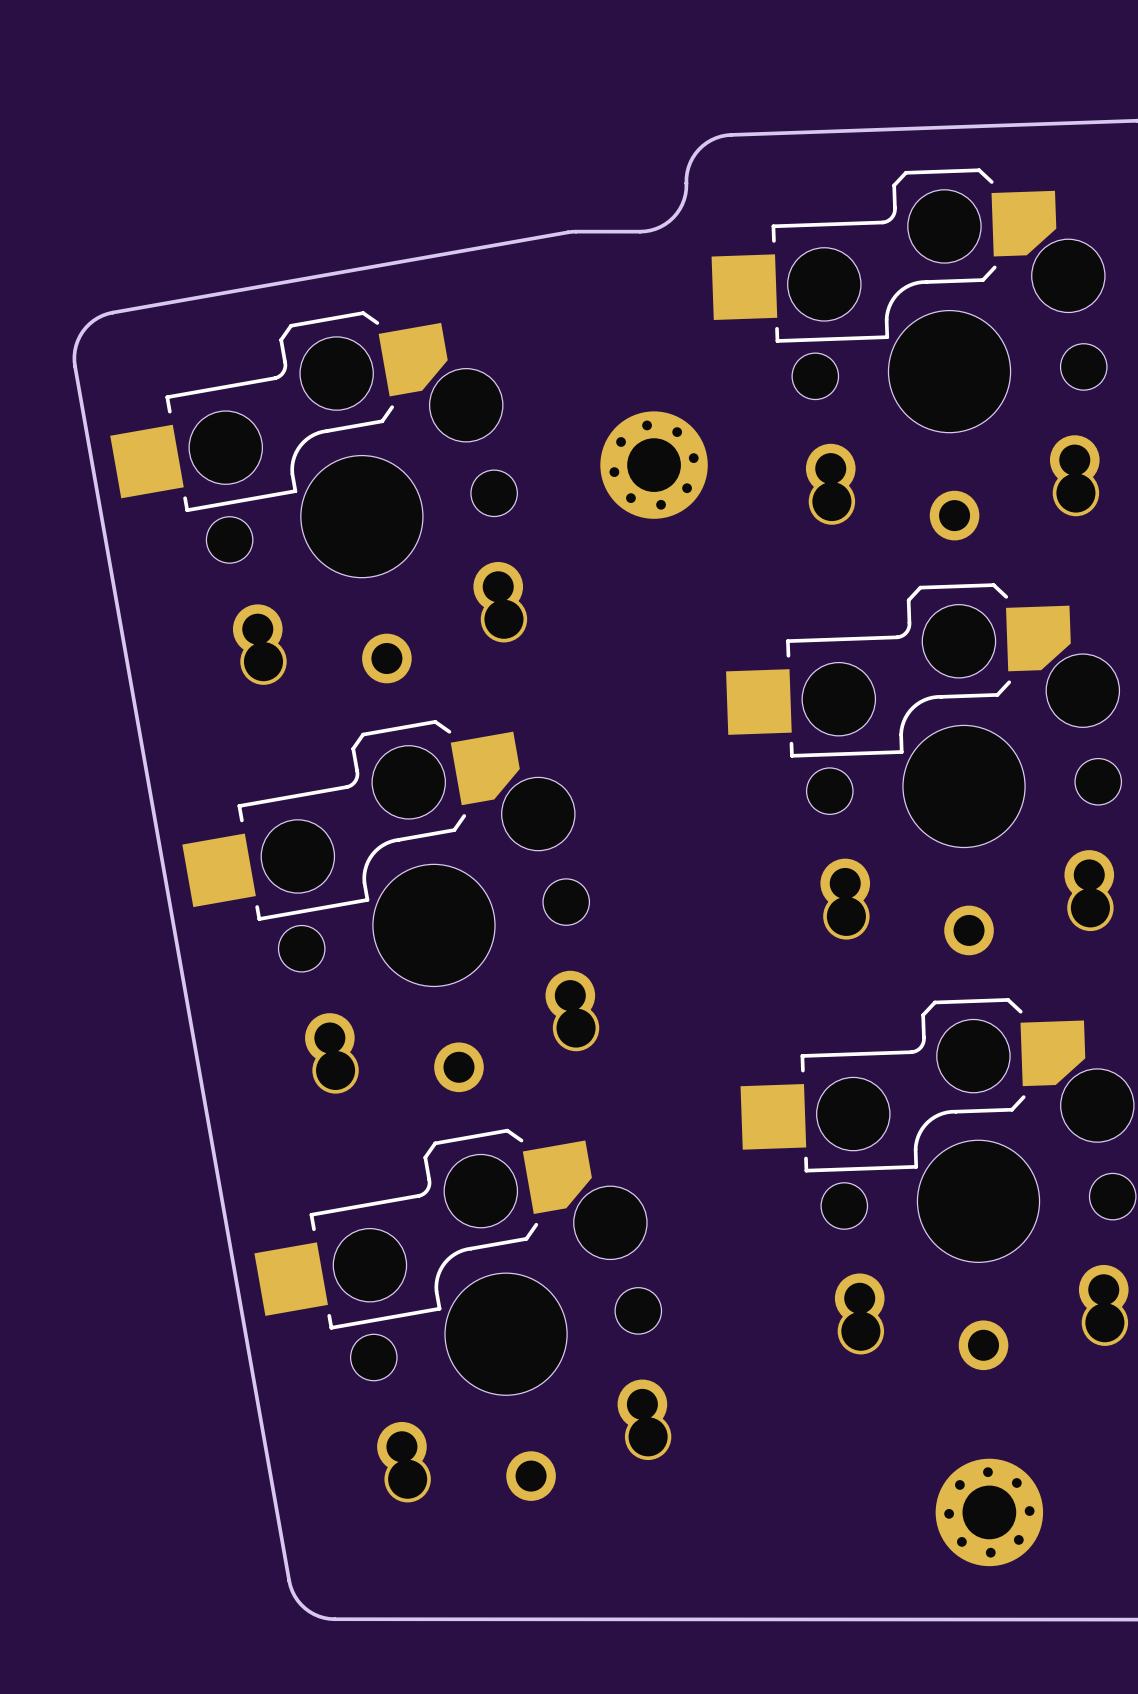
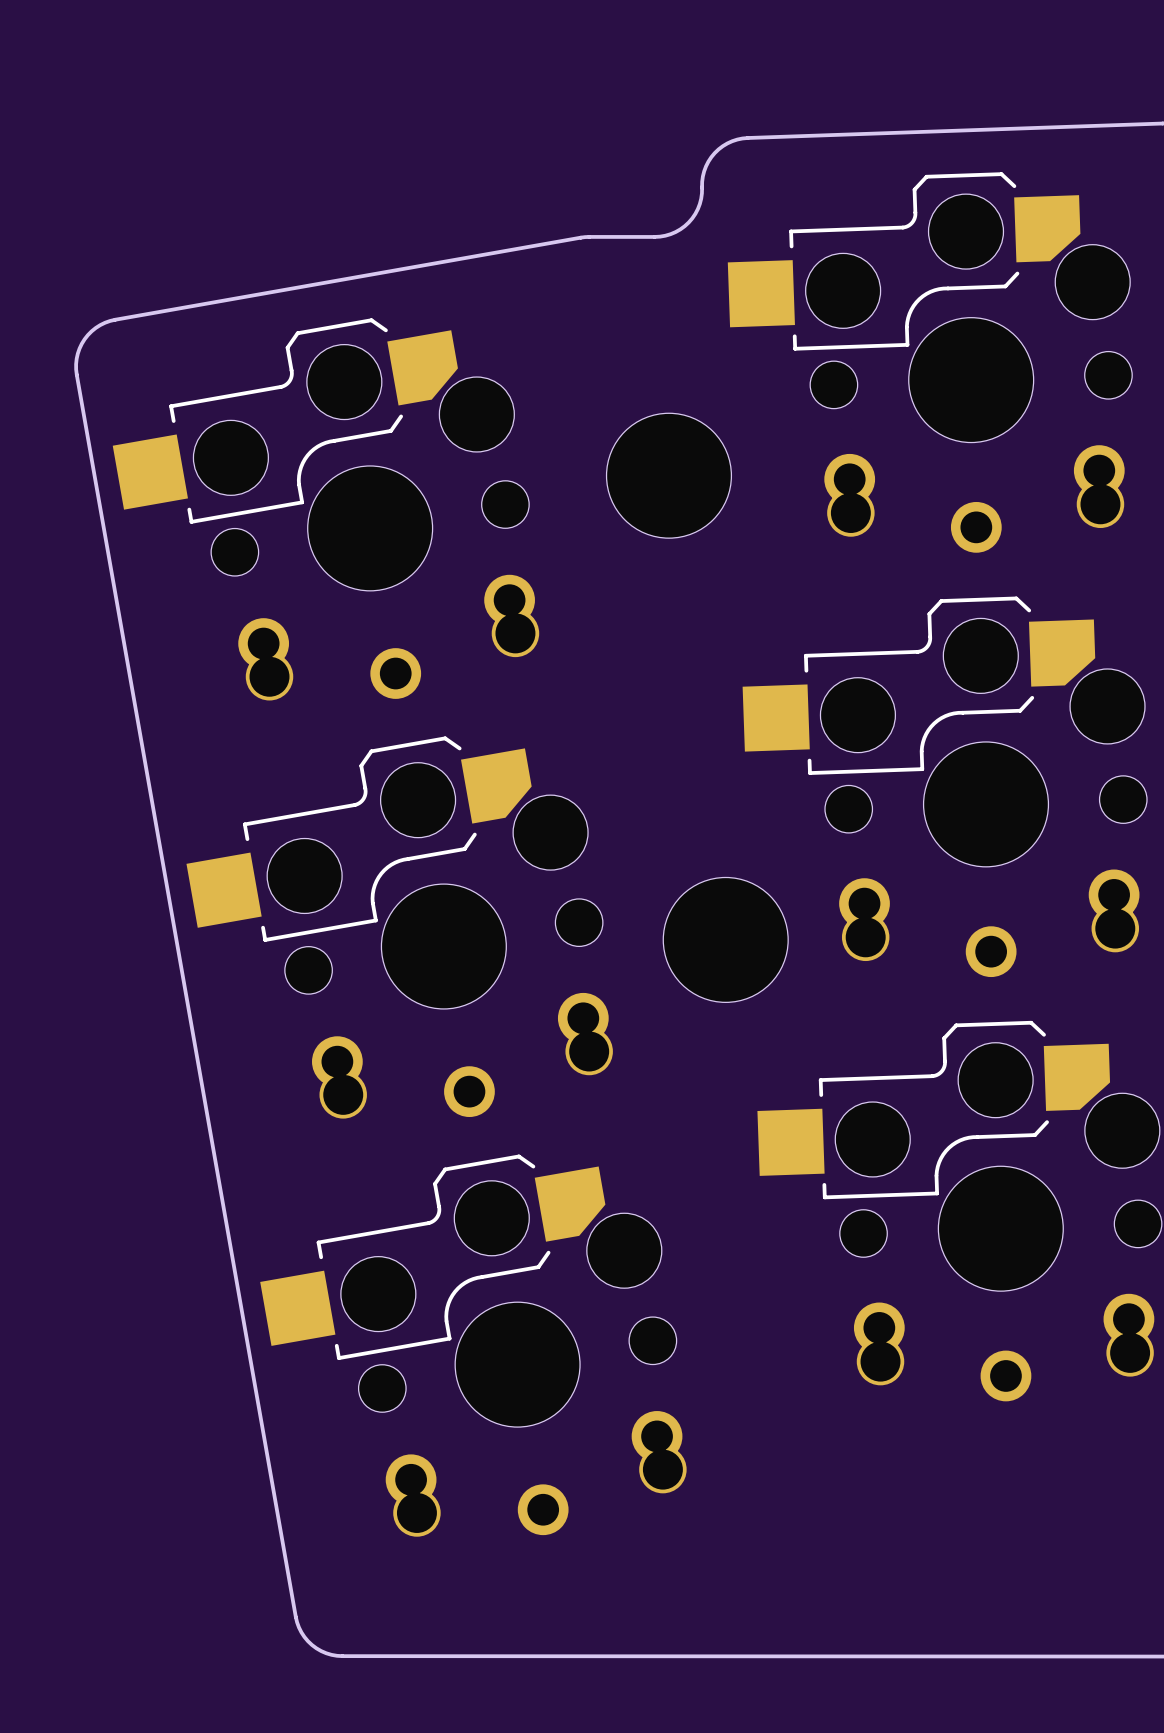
part footprint: [600, 411, 708, 519] -> [606, 413, 732, 539]
part: none -> (725, 939)
part: (989, 1512) -> none

